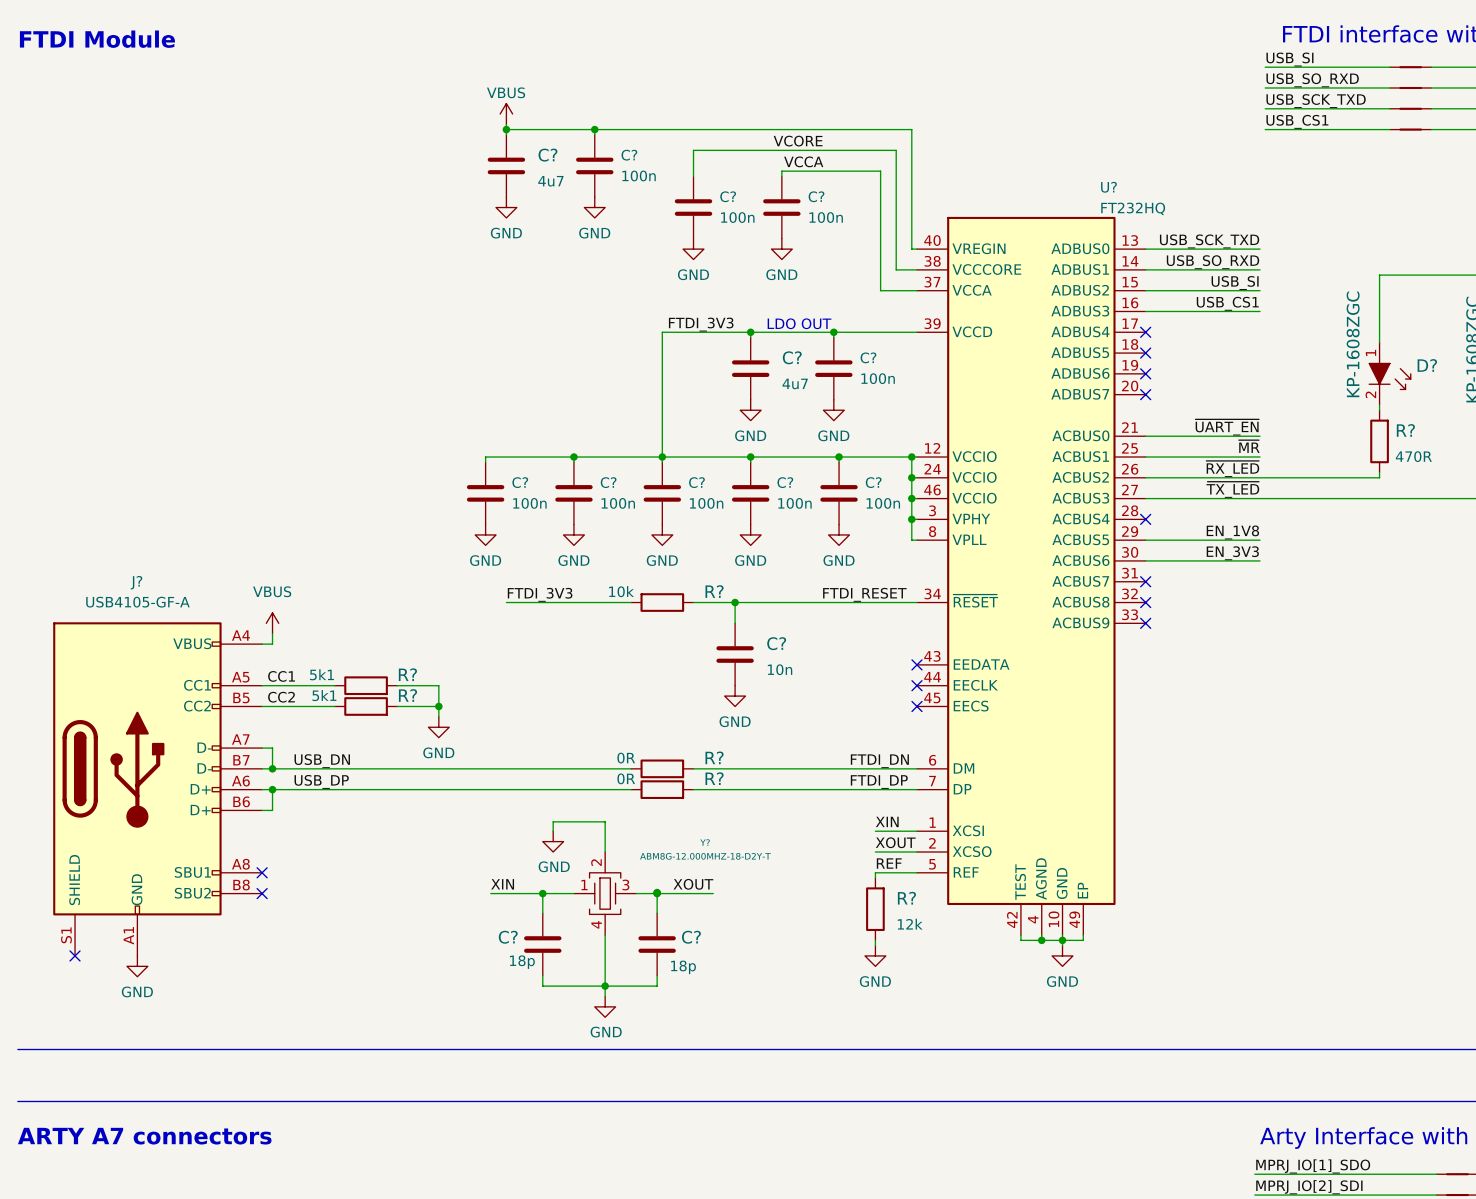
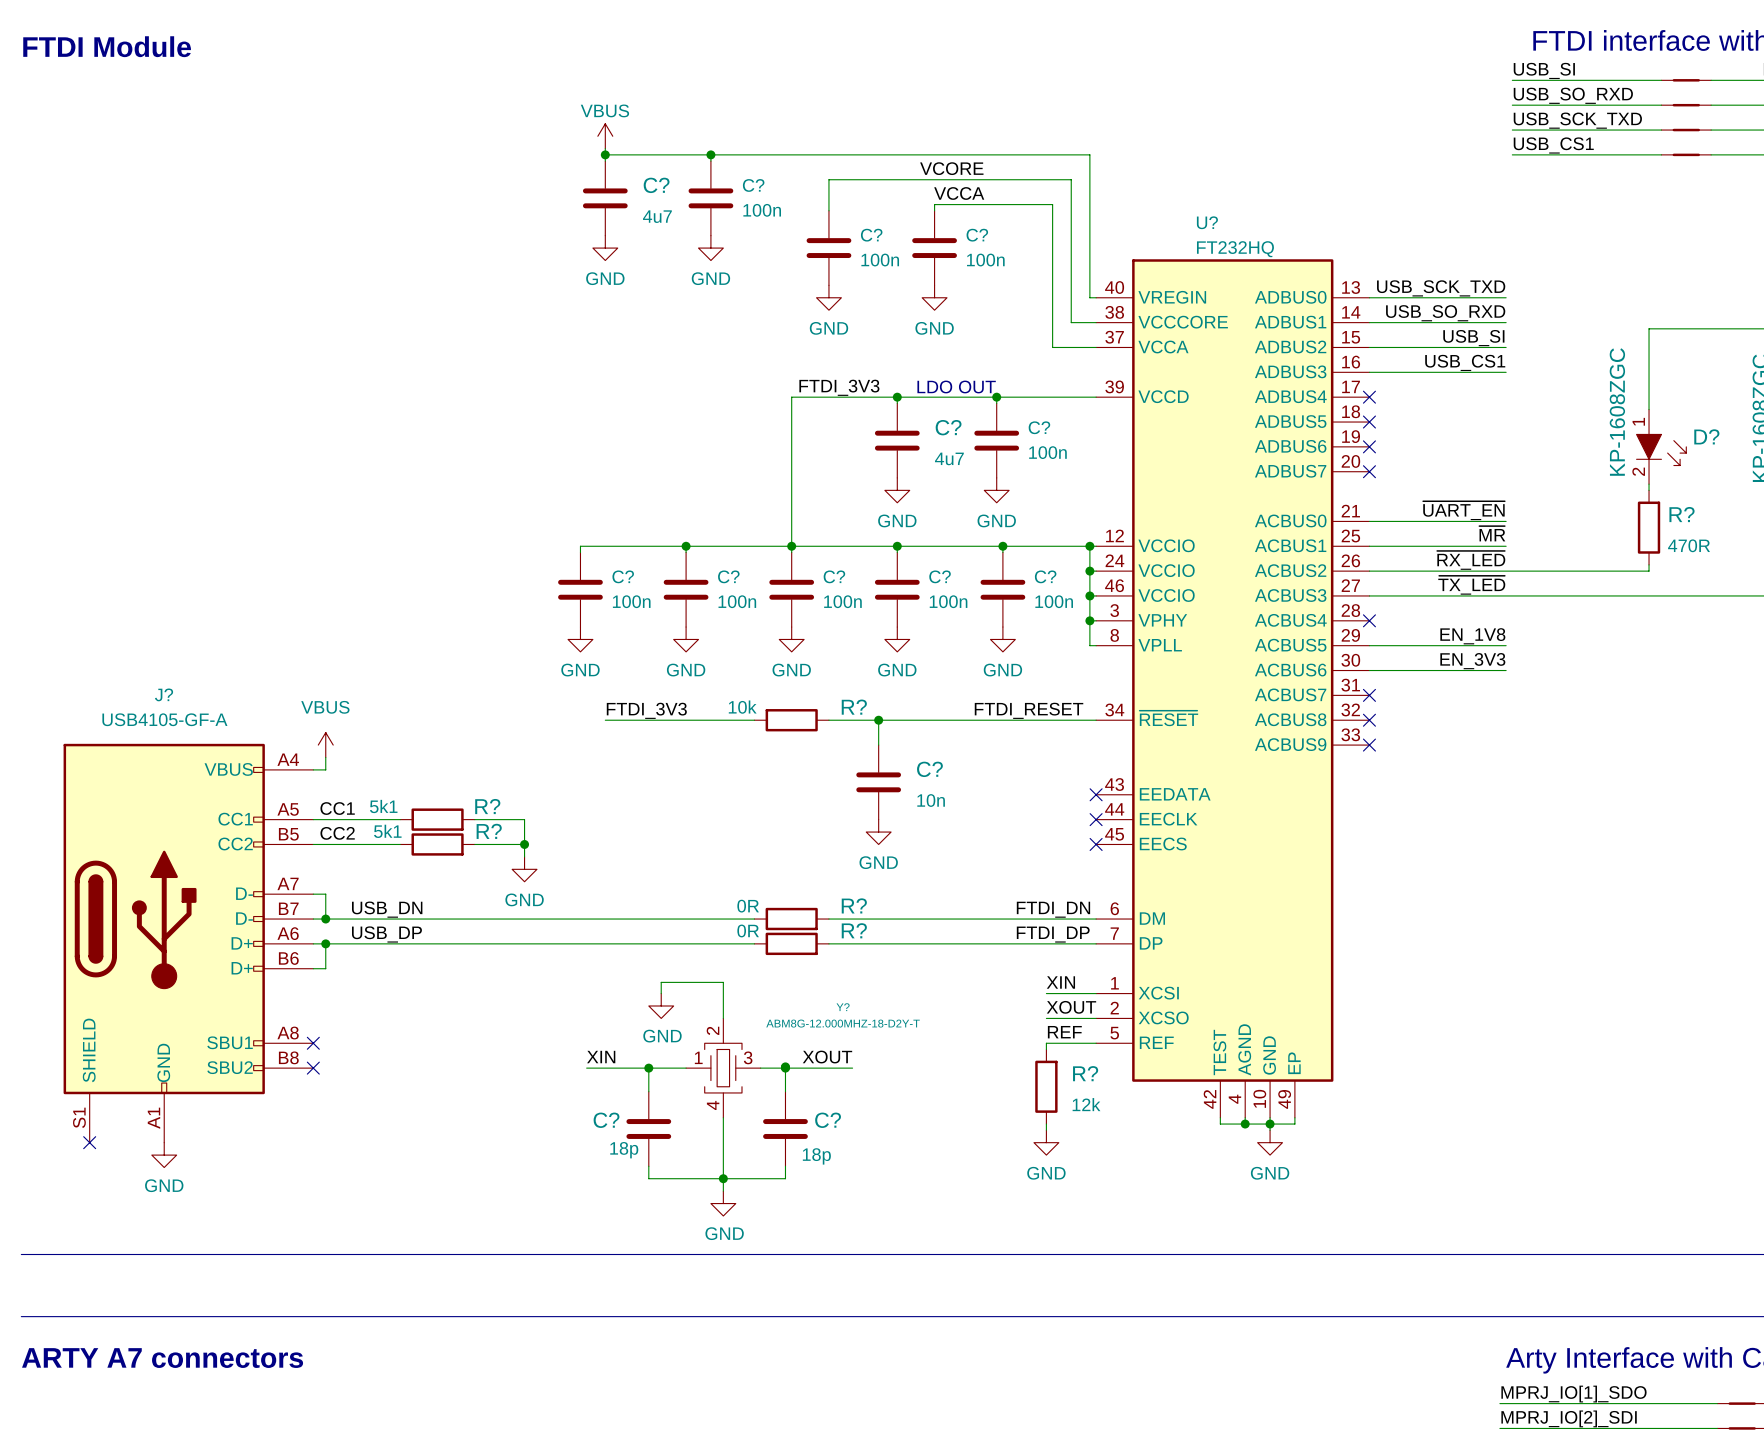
U? name position: U? (1108, 187) -> U? (1207, 222)
U? value position: FT232HQ (1133, 208) -> FT232HQ (1235, 249)

